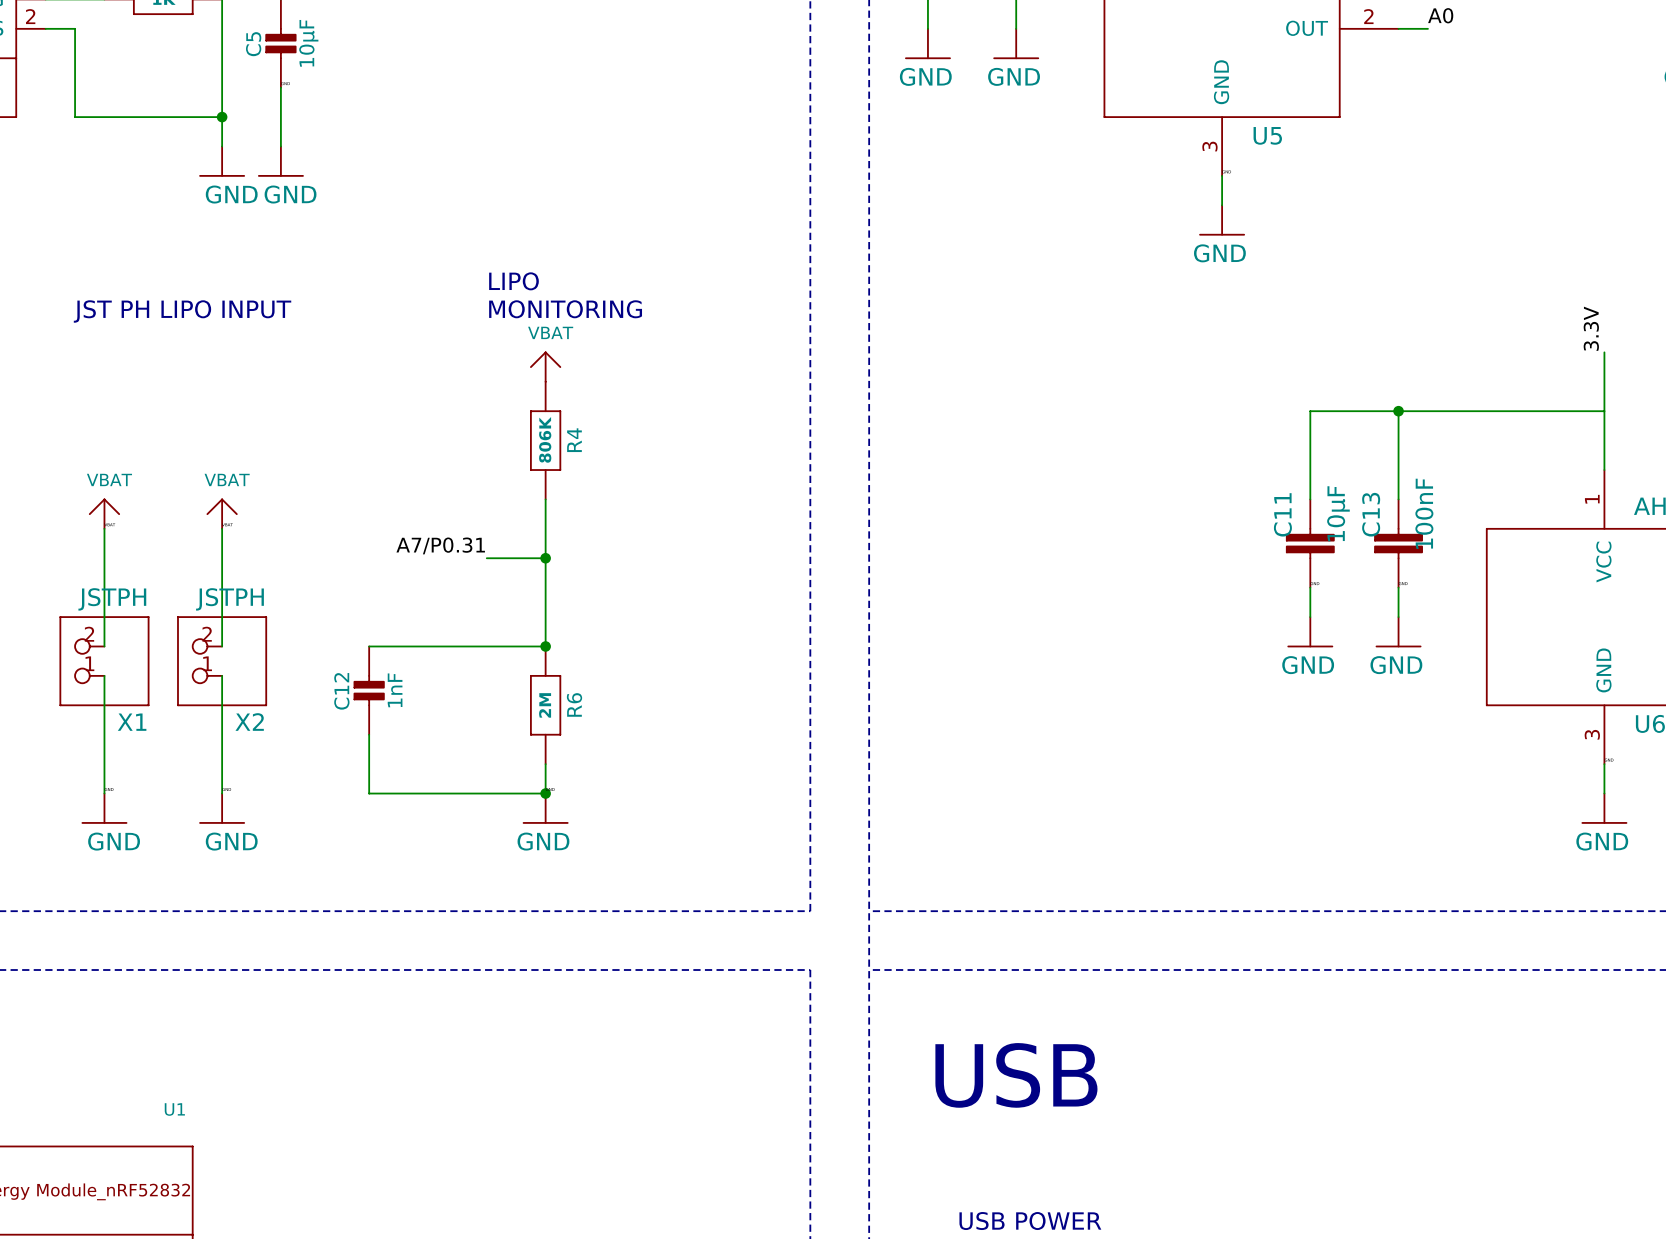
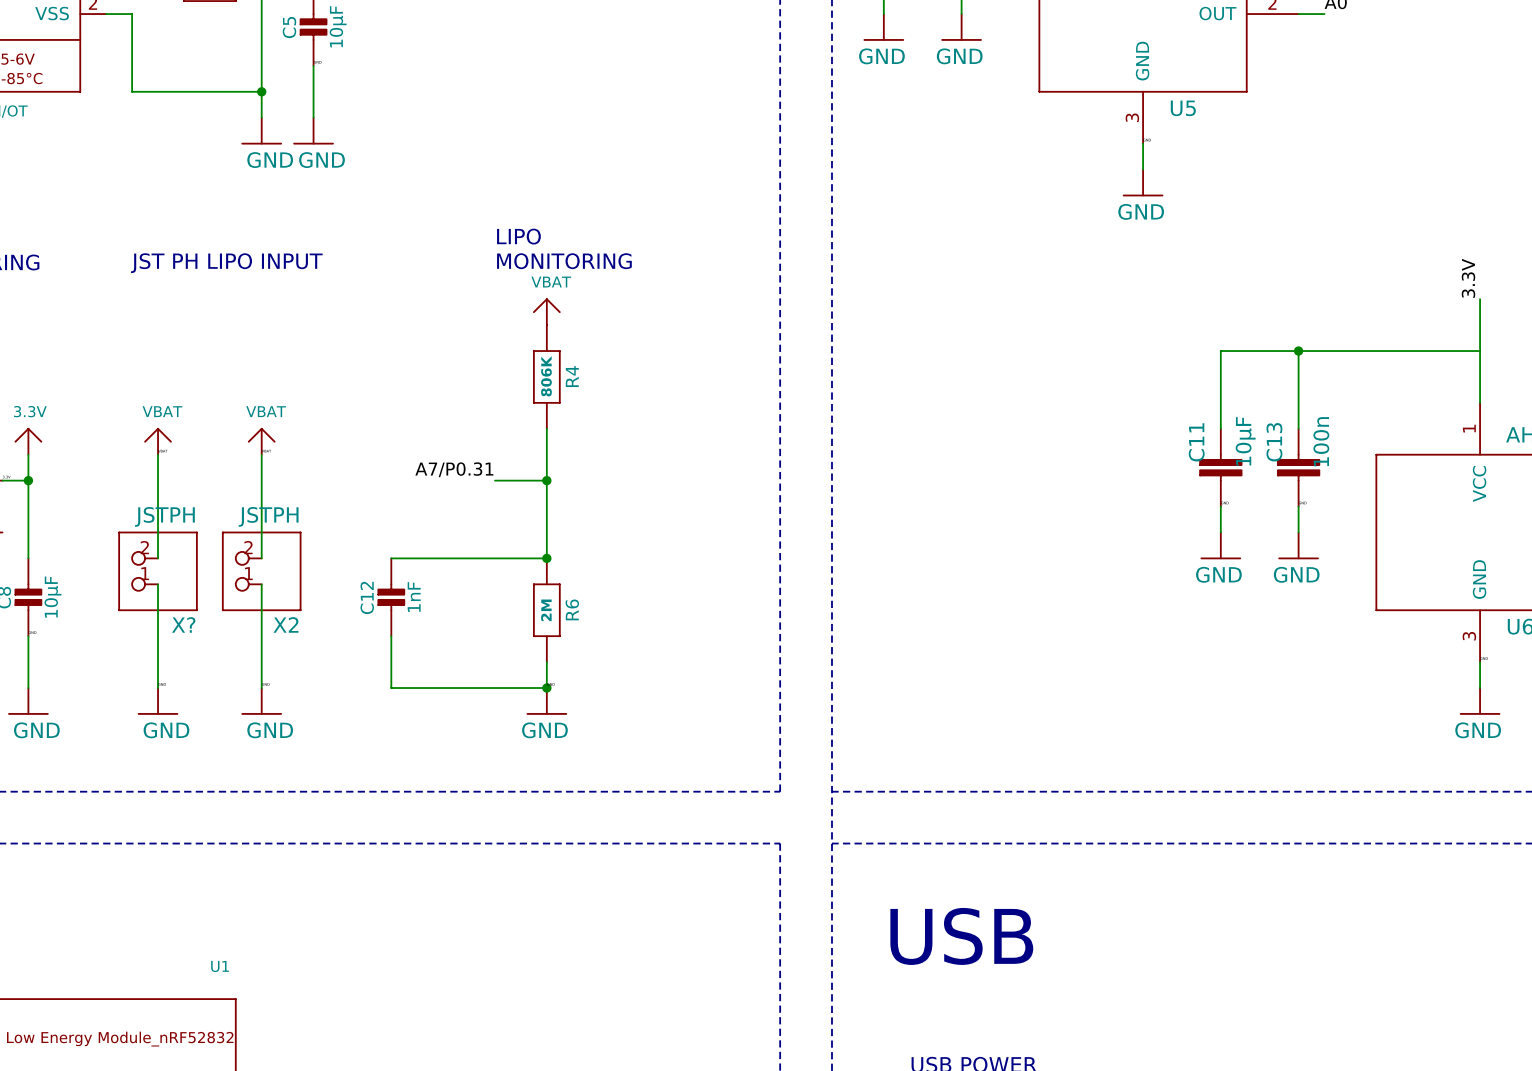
C13 value: 100nF (1424, 513) -> 100n (1321, 441)
X1 name: X1 (132, 722) -> X? (183, 624)

